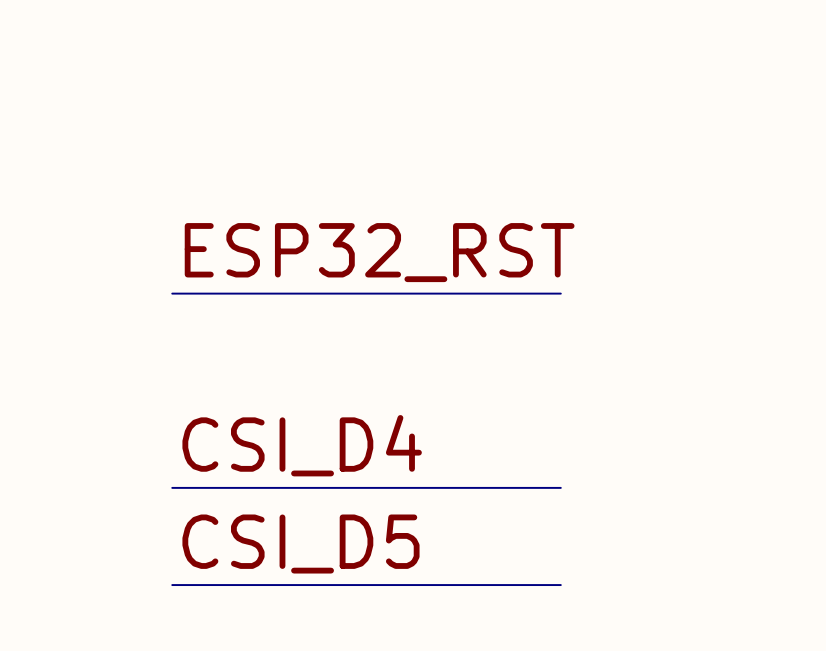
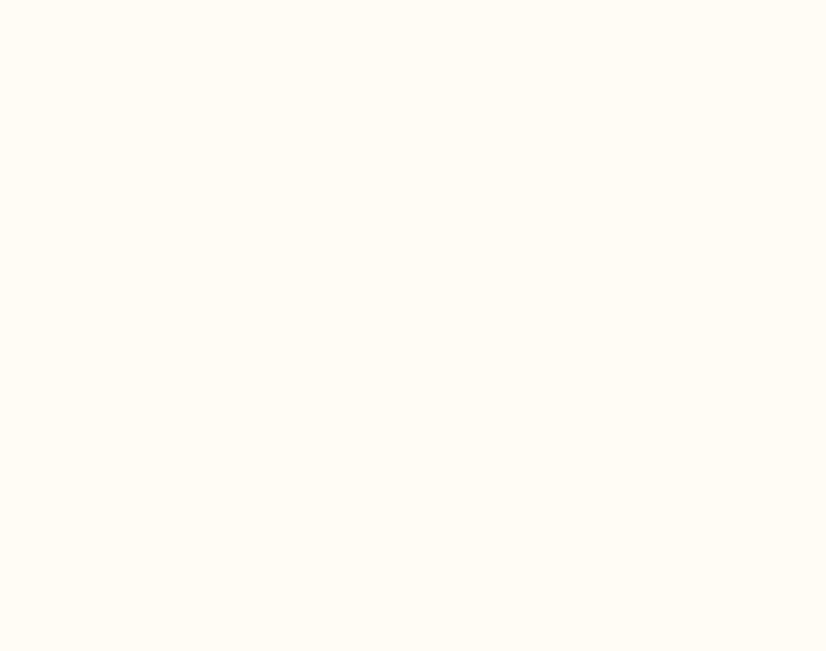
label: ESP32_RST (379, 252) -> none
wire: (172, 293) (560, 293) -> none
label: CSI_D4 (302, 445) -> none
wire: (172, 487) (560, 487) -> none
label: CSI_D5 (300, 544) -> none
wire: (172, 585) (560, 585) -> none

